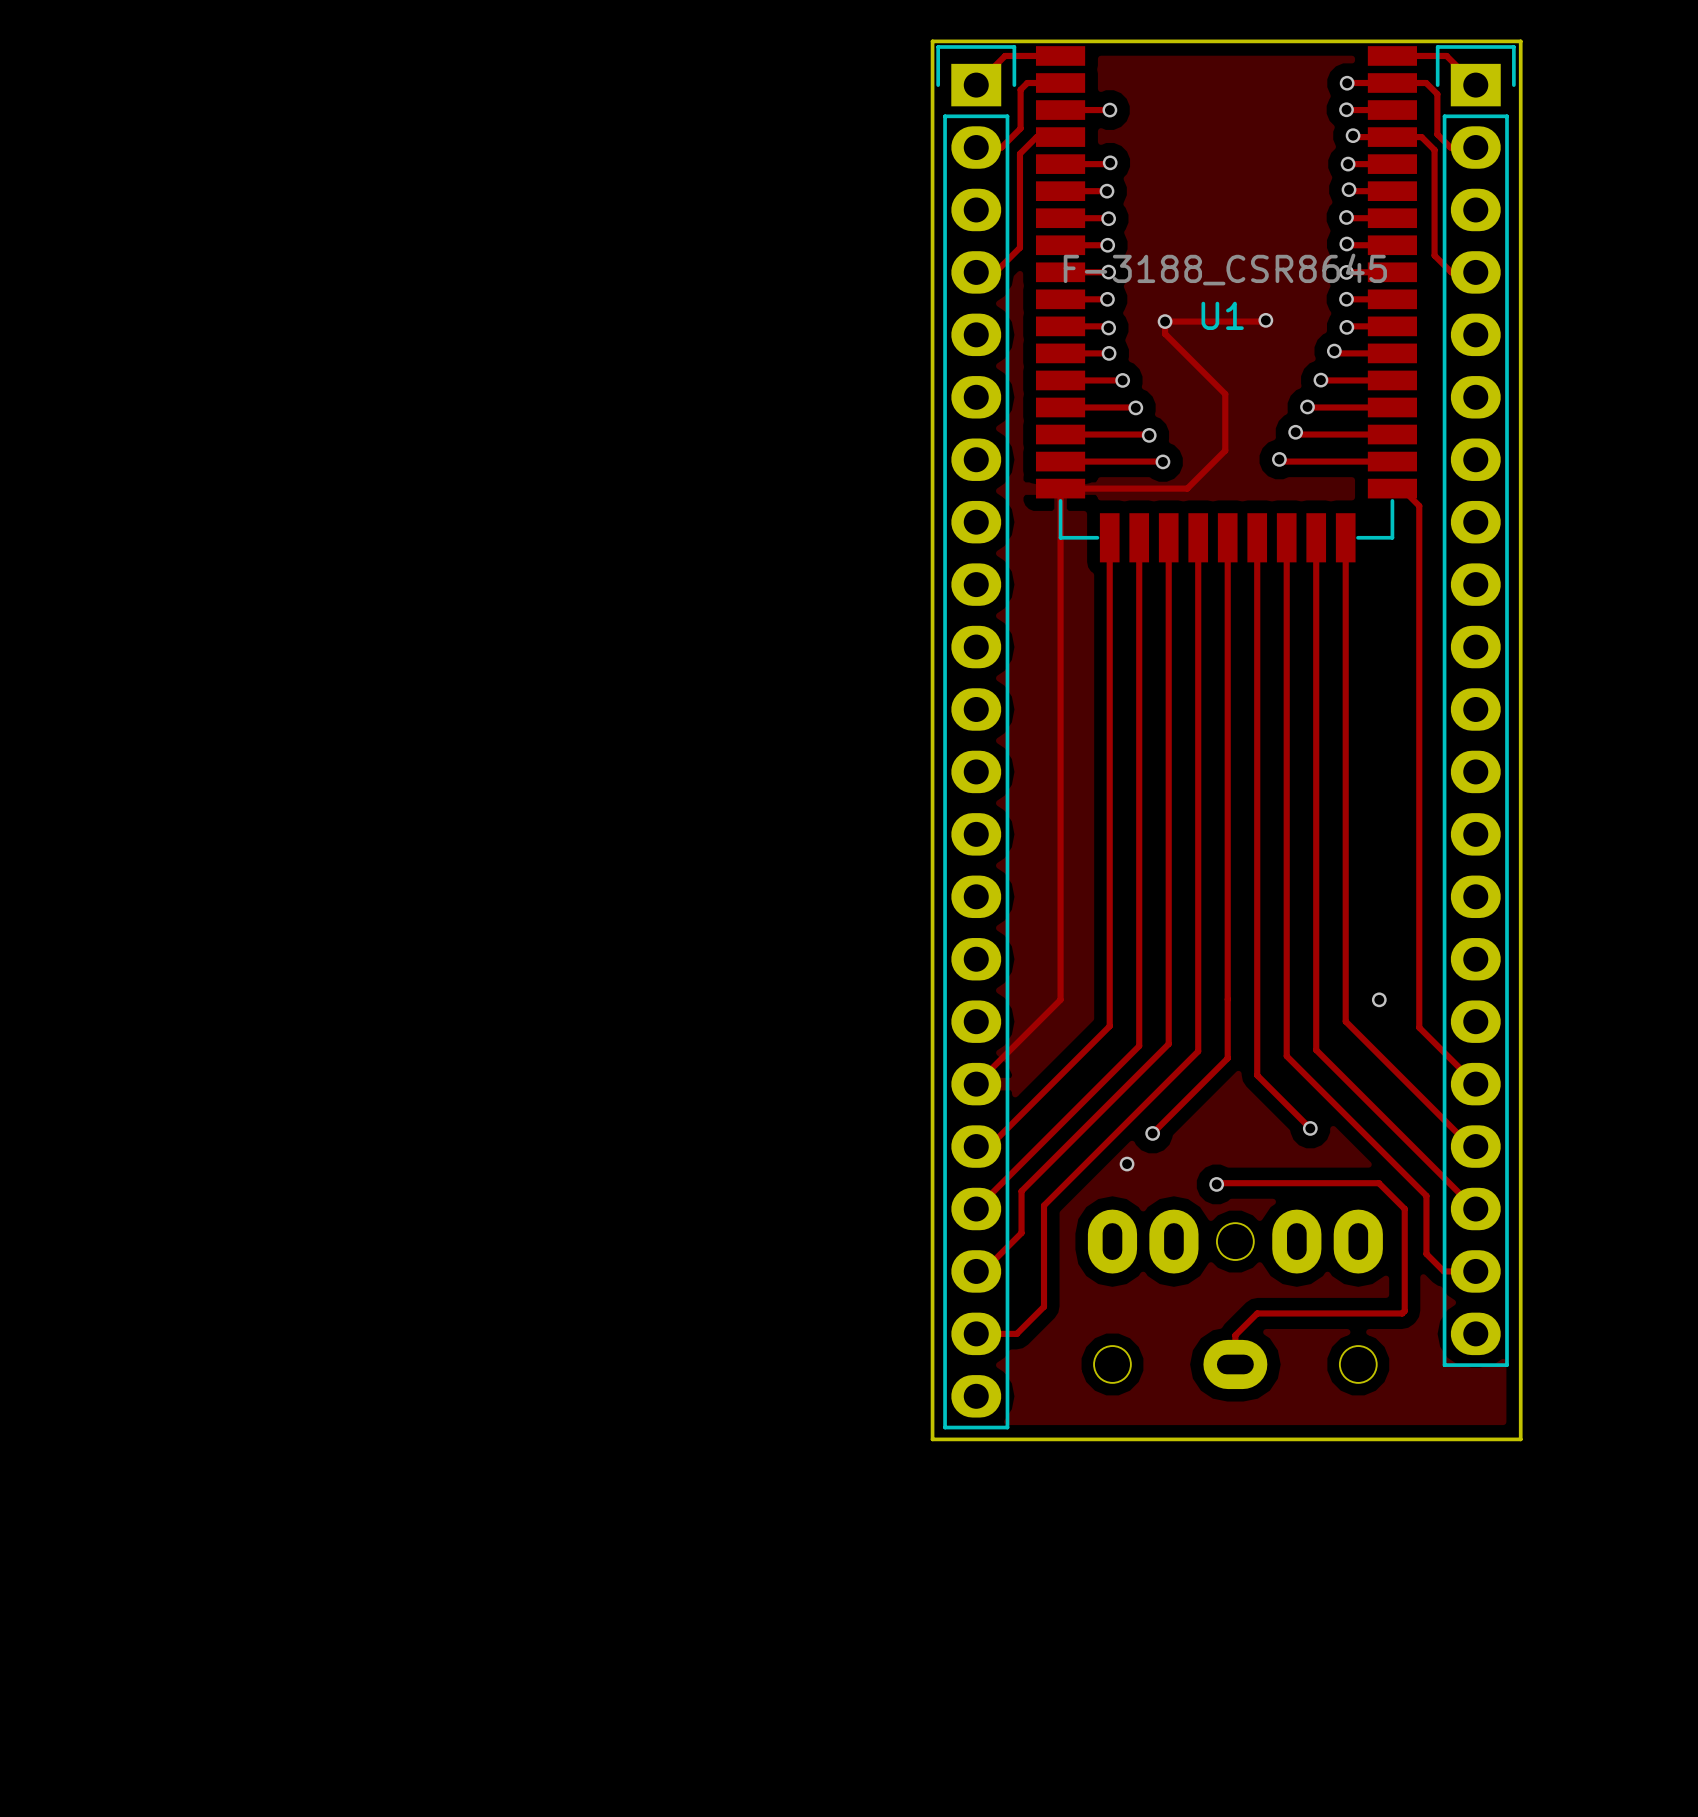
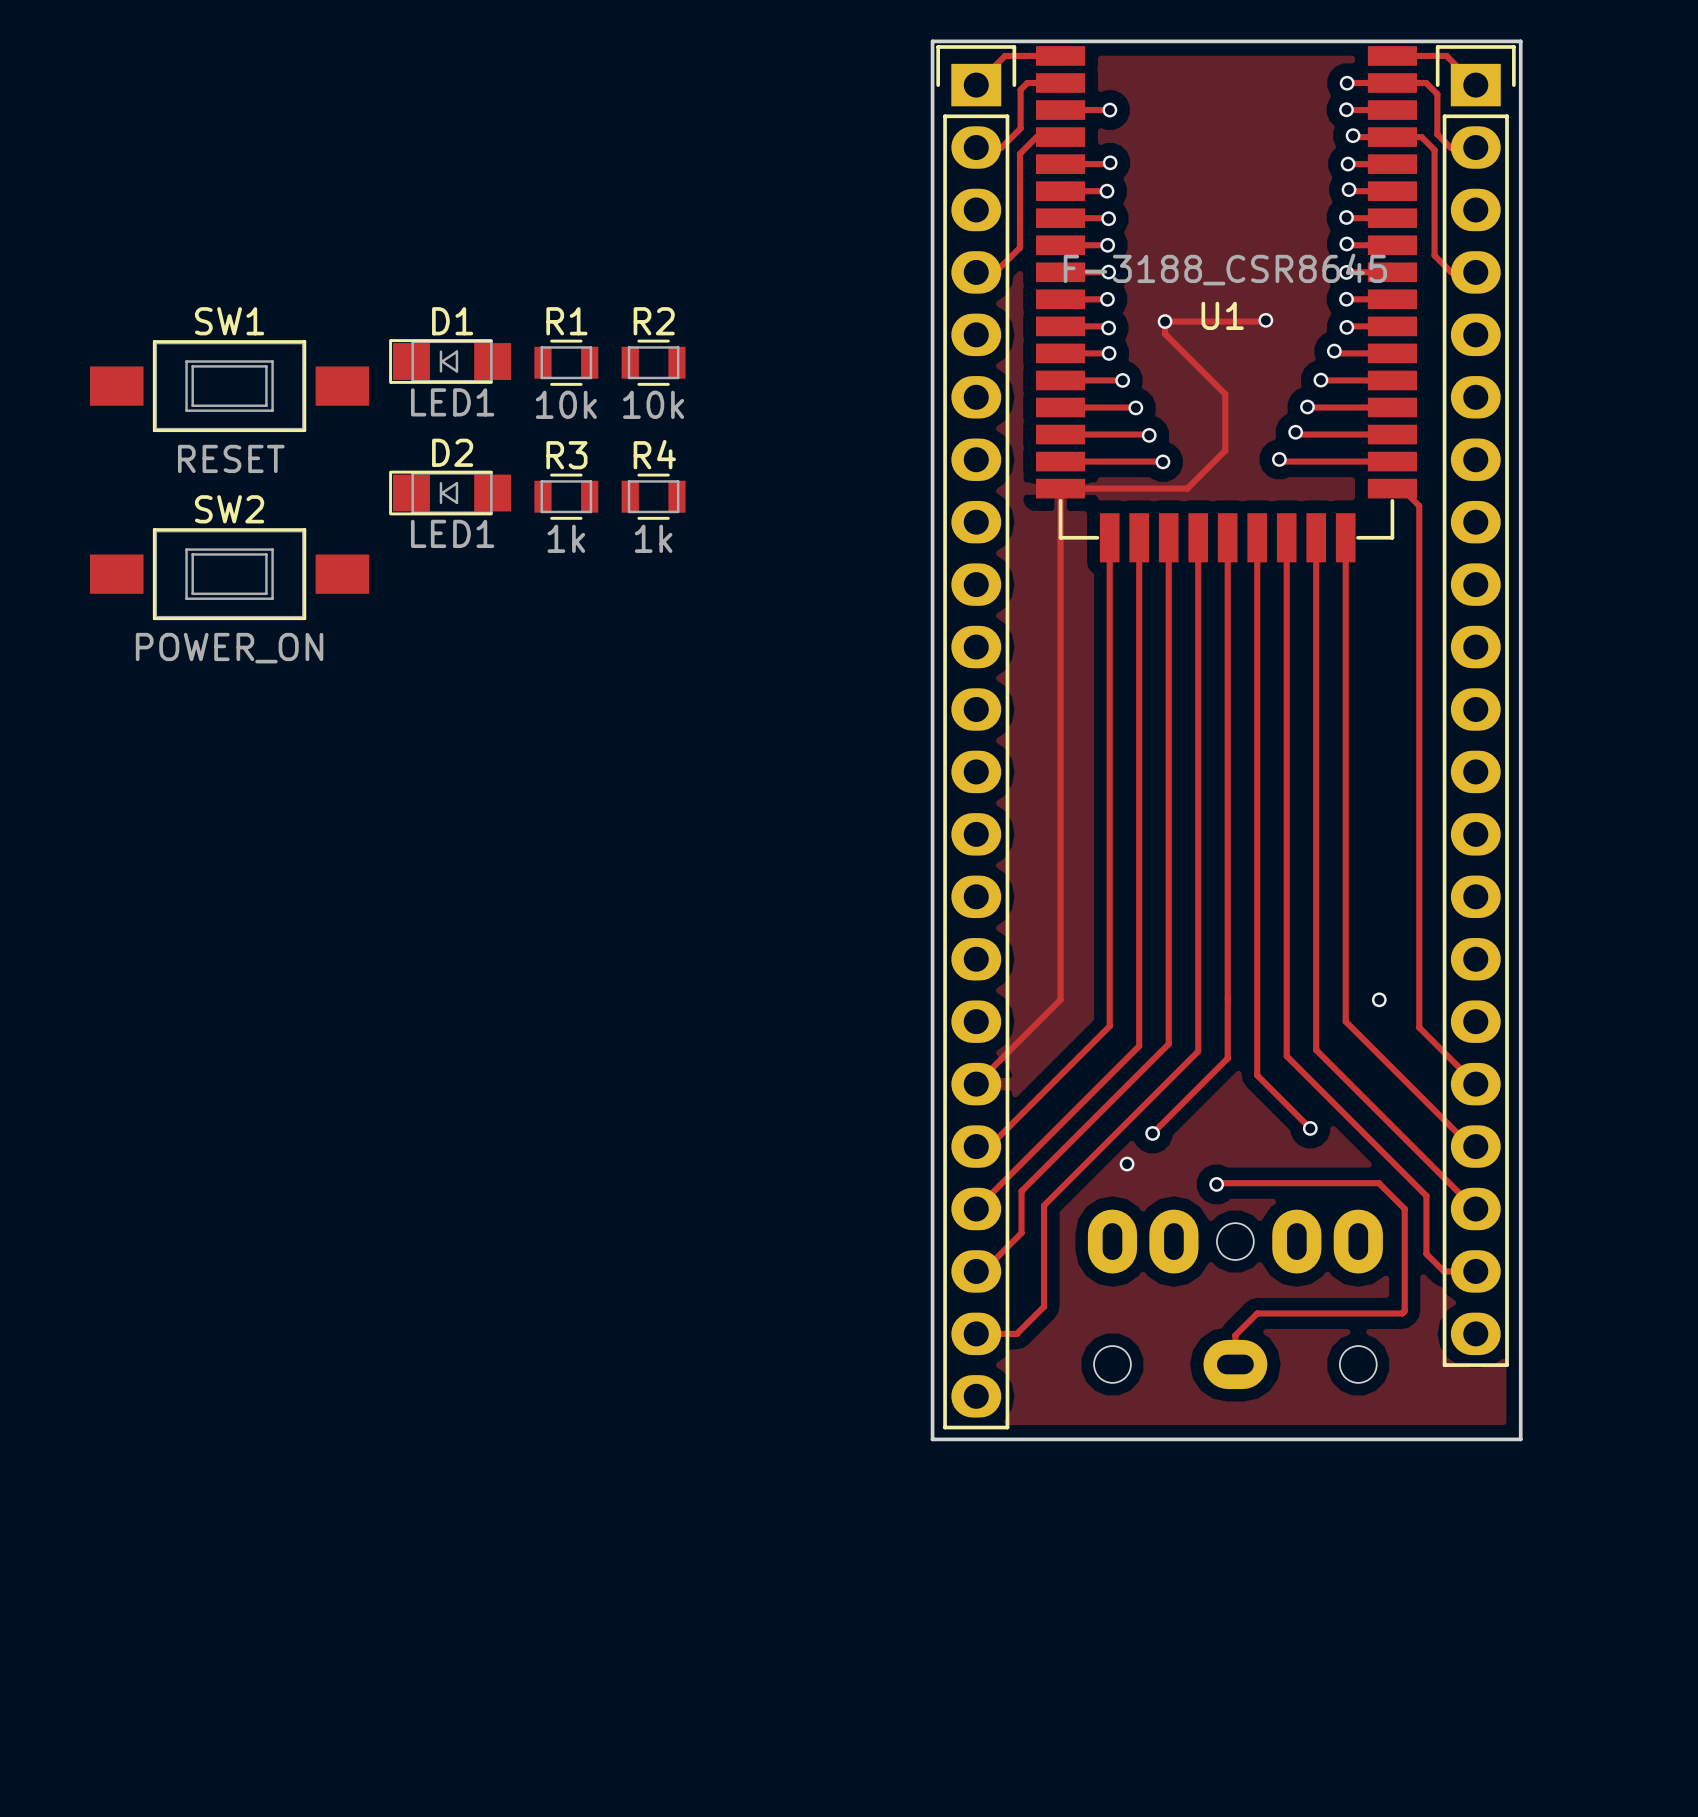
D1: none -> LED1 (450, 361)
R1: none -> 10k (566, 362)
R2: none -> 10k (653, 362)
SW1: none -> RESET (229, 386)
D2: none -> LED1 (450, 493)
R3: none -> 1k (566, 496)
R4: none -> 1k (653, 496)
SW2: none -> POWER_ON (229, 574)

